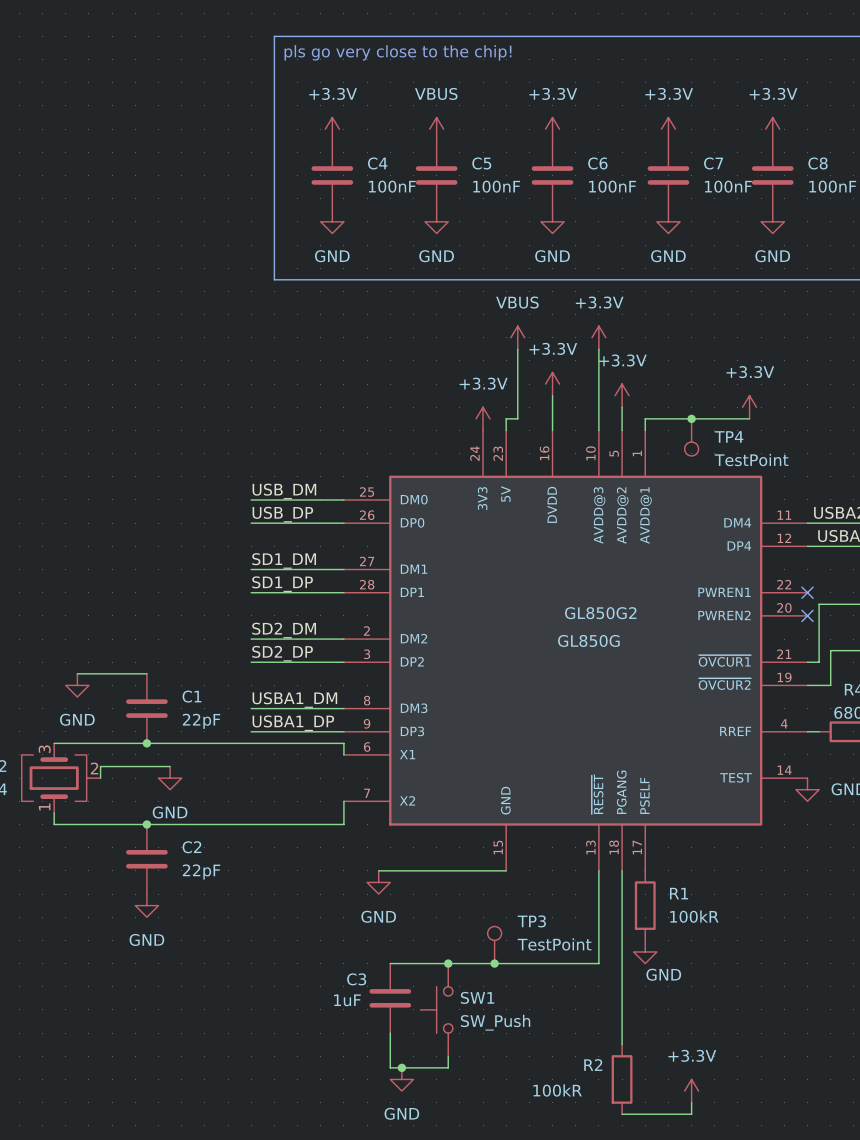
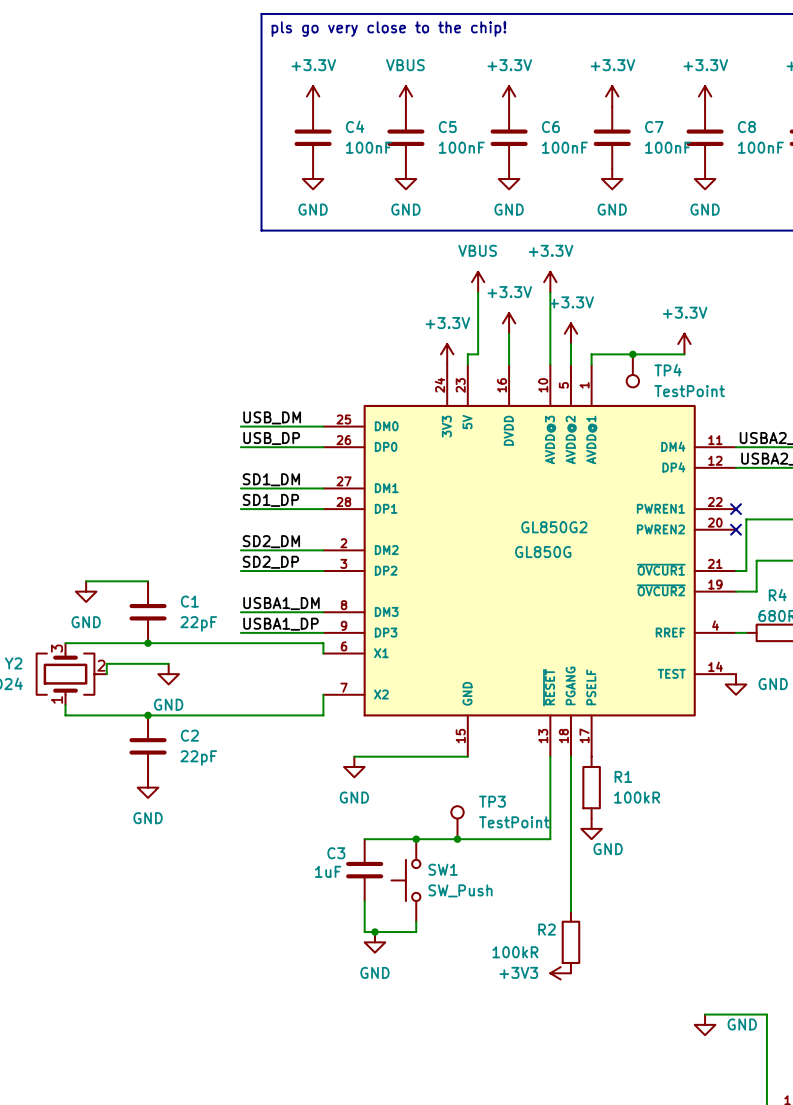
power symbol: +3.3V (691, 1091) -> none
wire: (691, 1102) (691, 1114) (622, 1114) -> none
power symbol: none -> +3V3 (560, 973)

